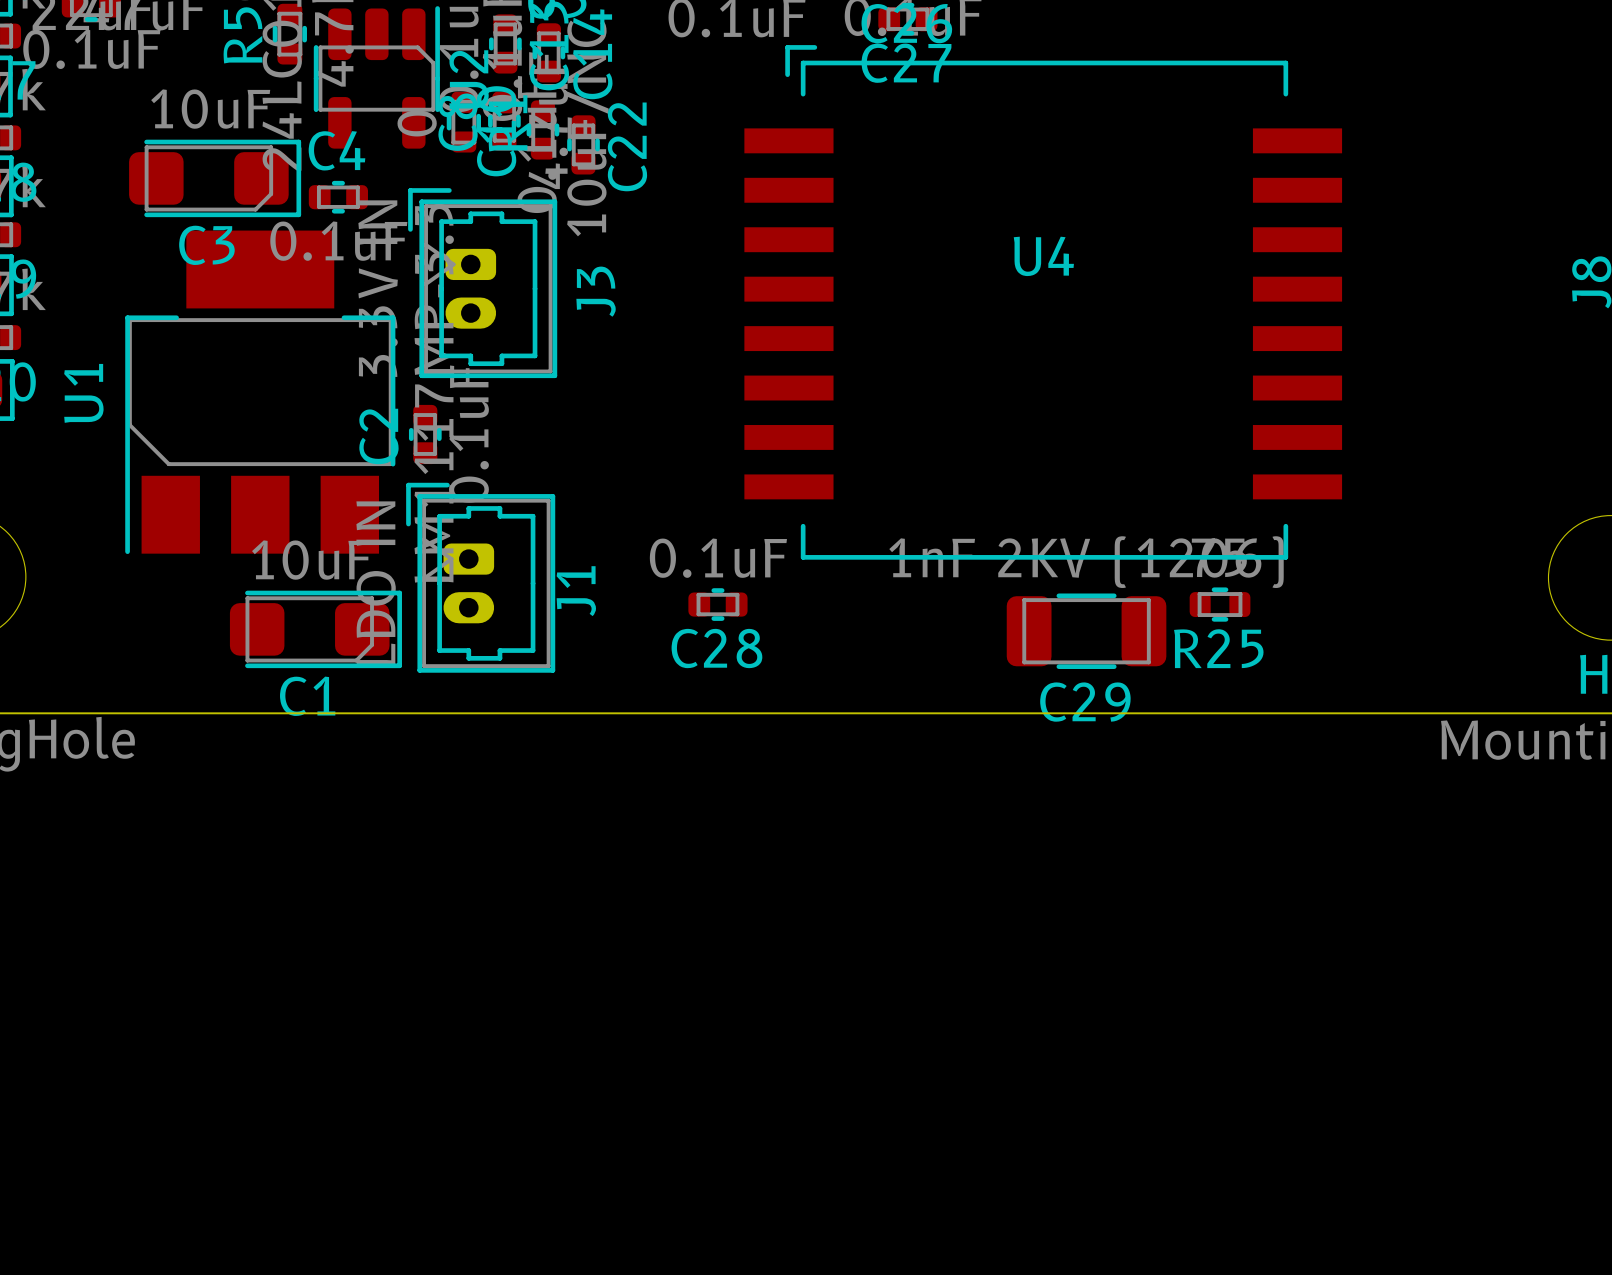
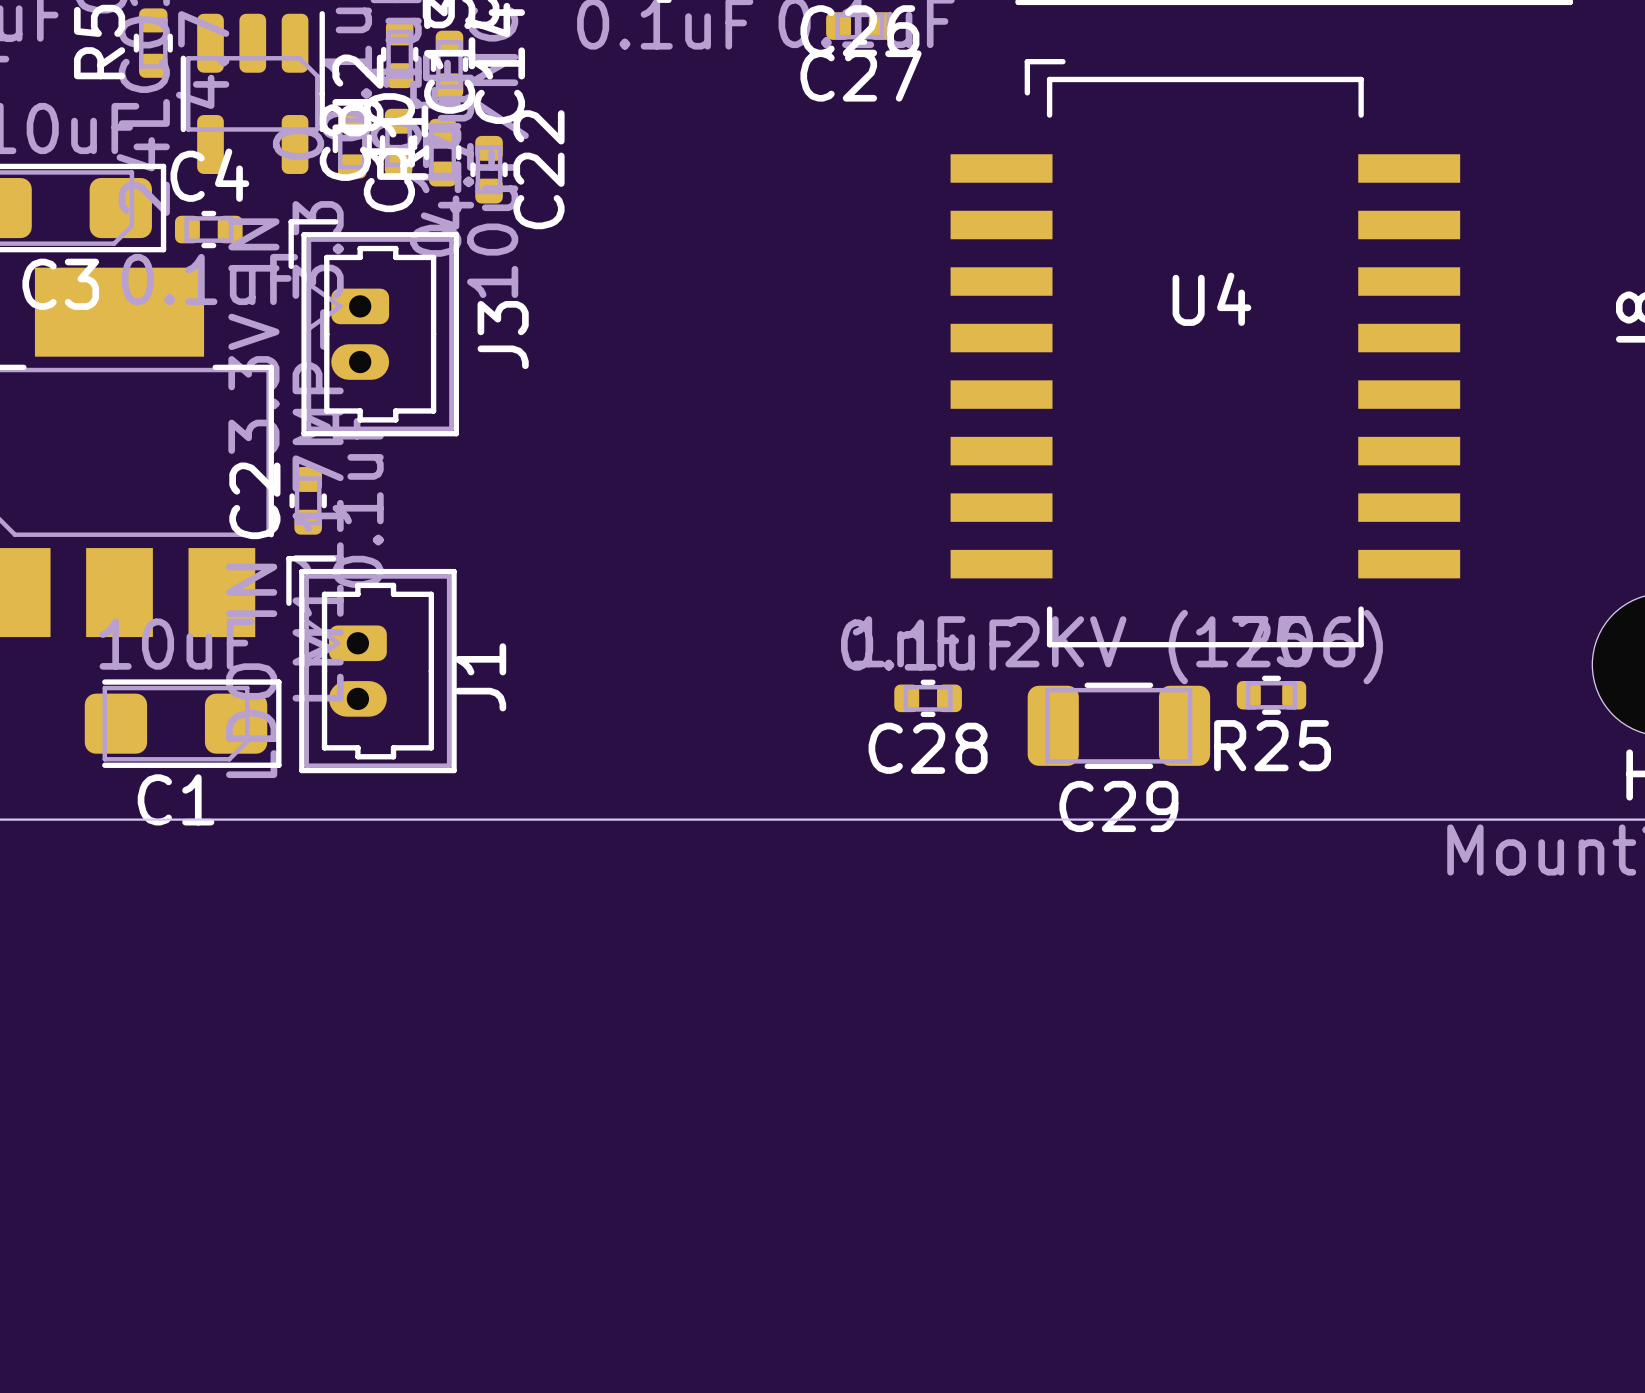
U4 footprint: [744, 45, 1343, 560] -> [950, 59, 1461, 648]
C28 position: (717, 604) -> (928, 698)
R25 position: (1220, 604) -> (1271, 695)
C29 position: (1086, 631) -> (1118, 725)

